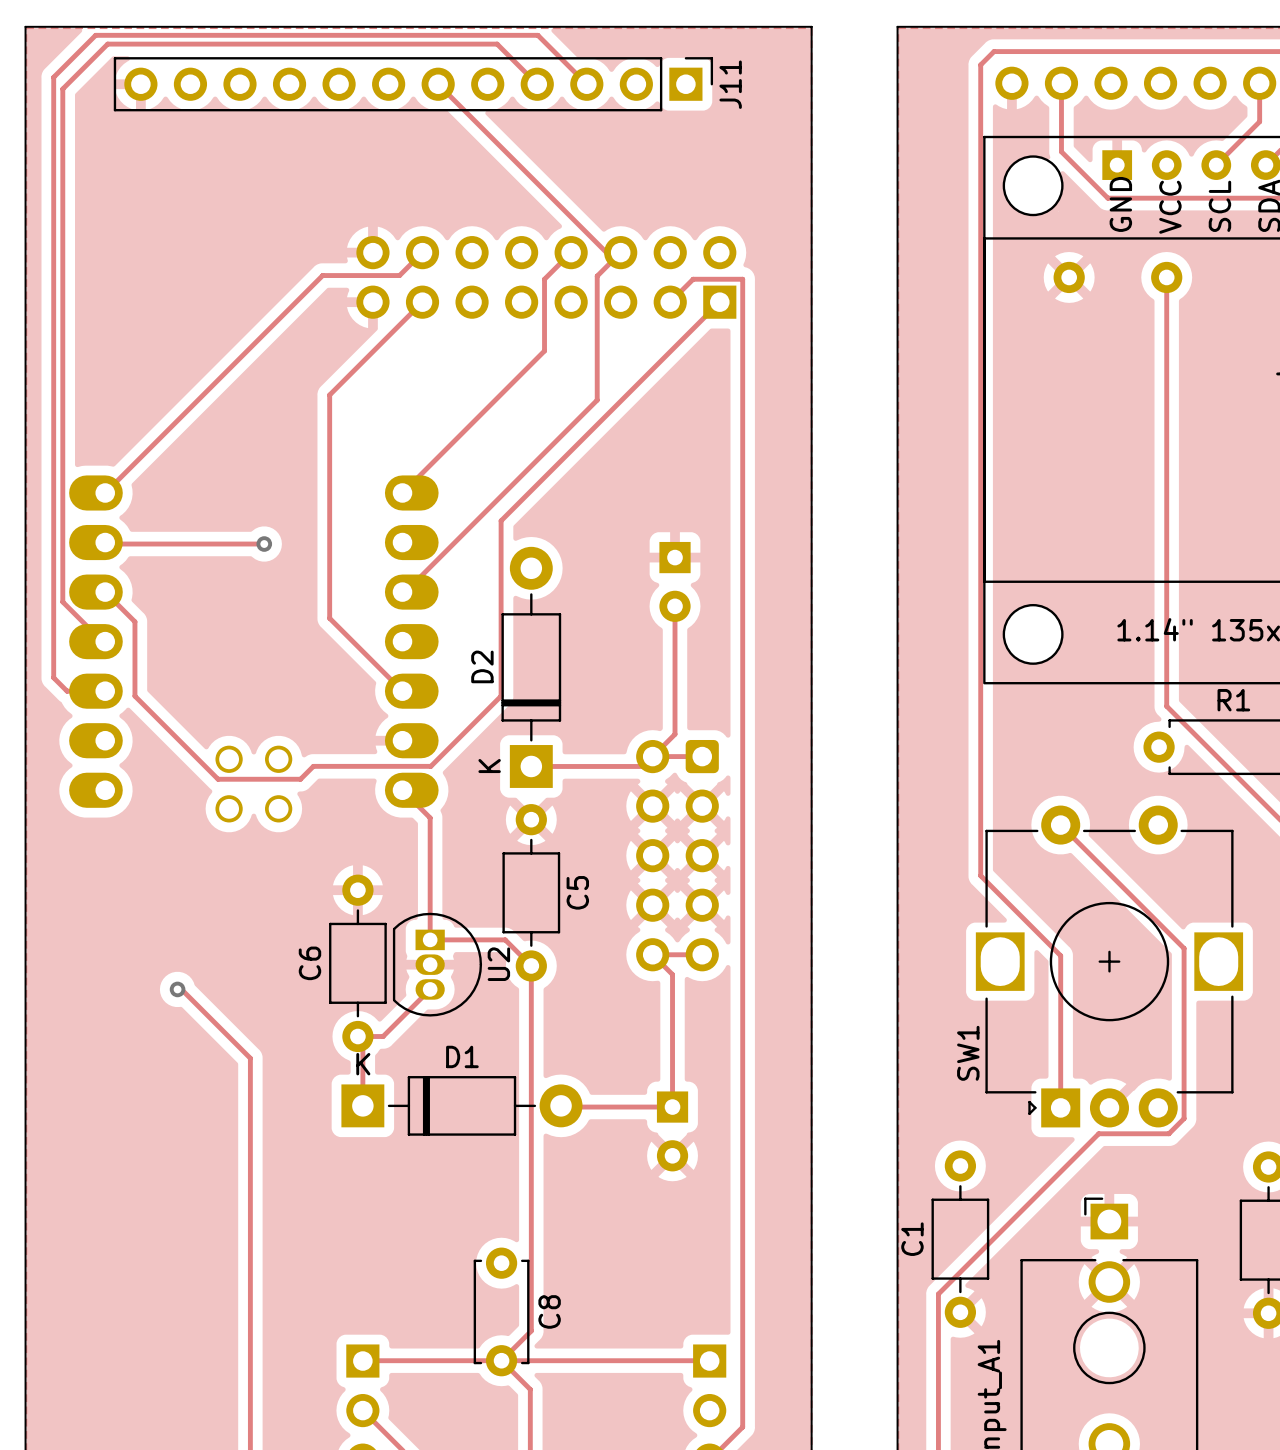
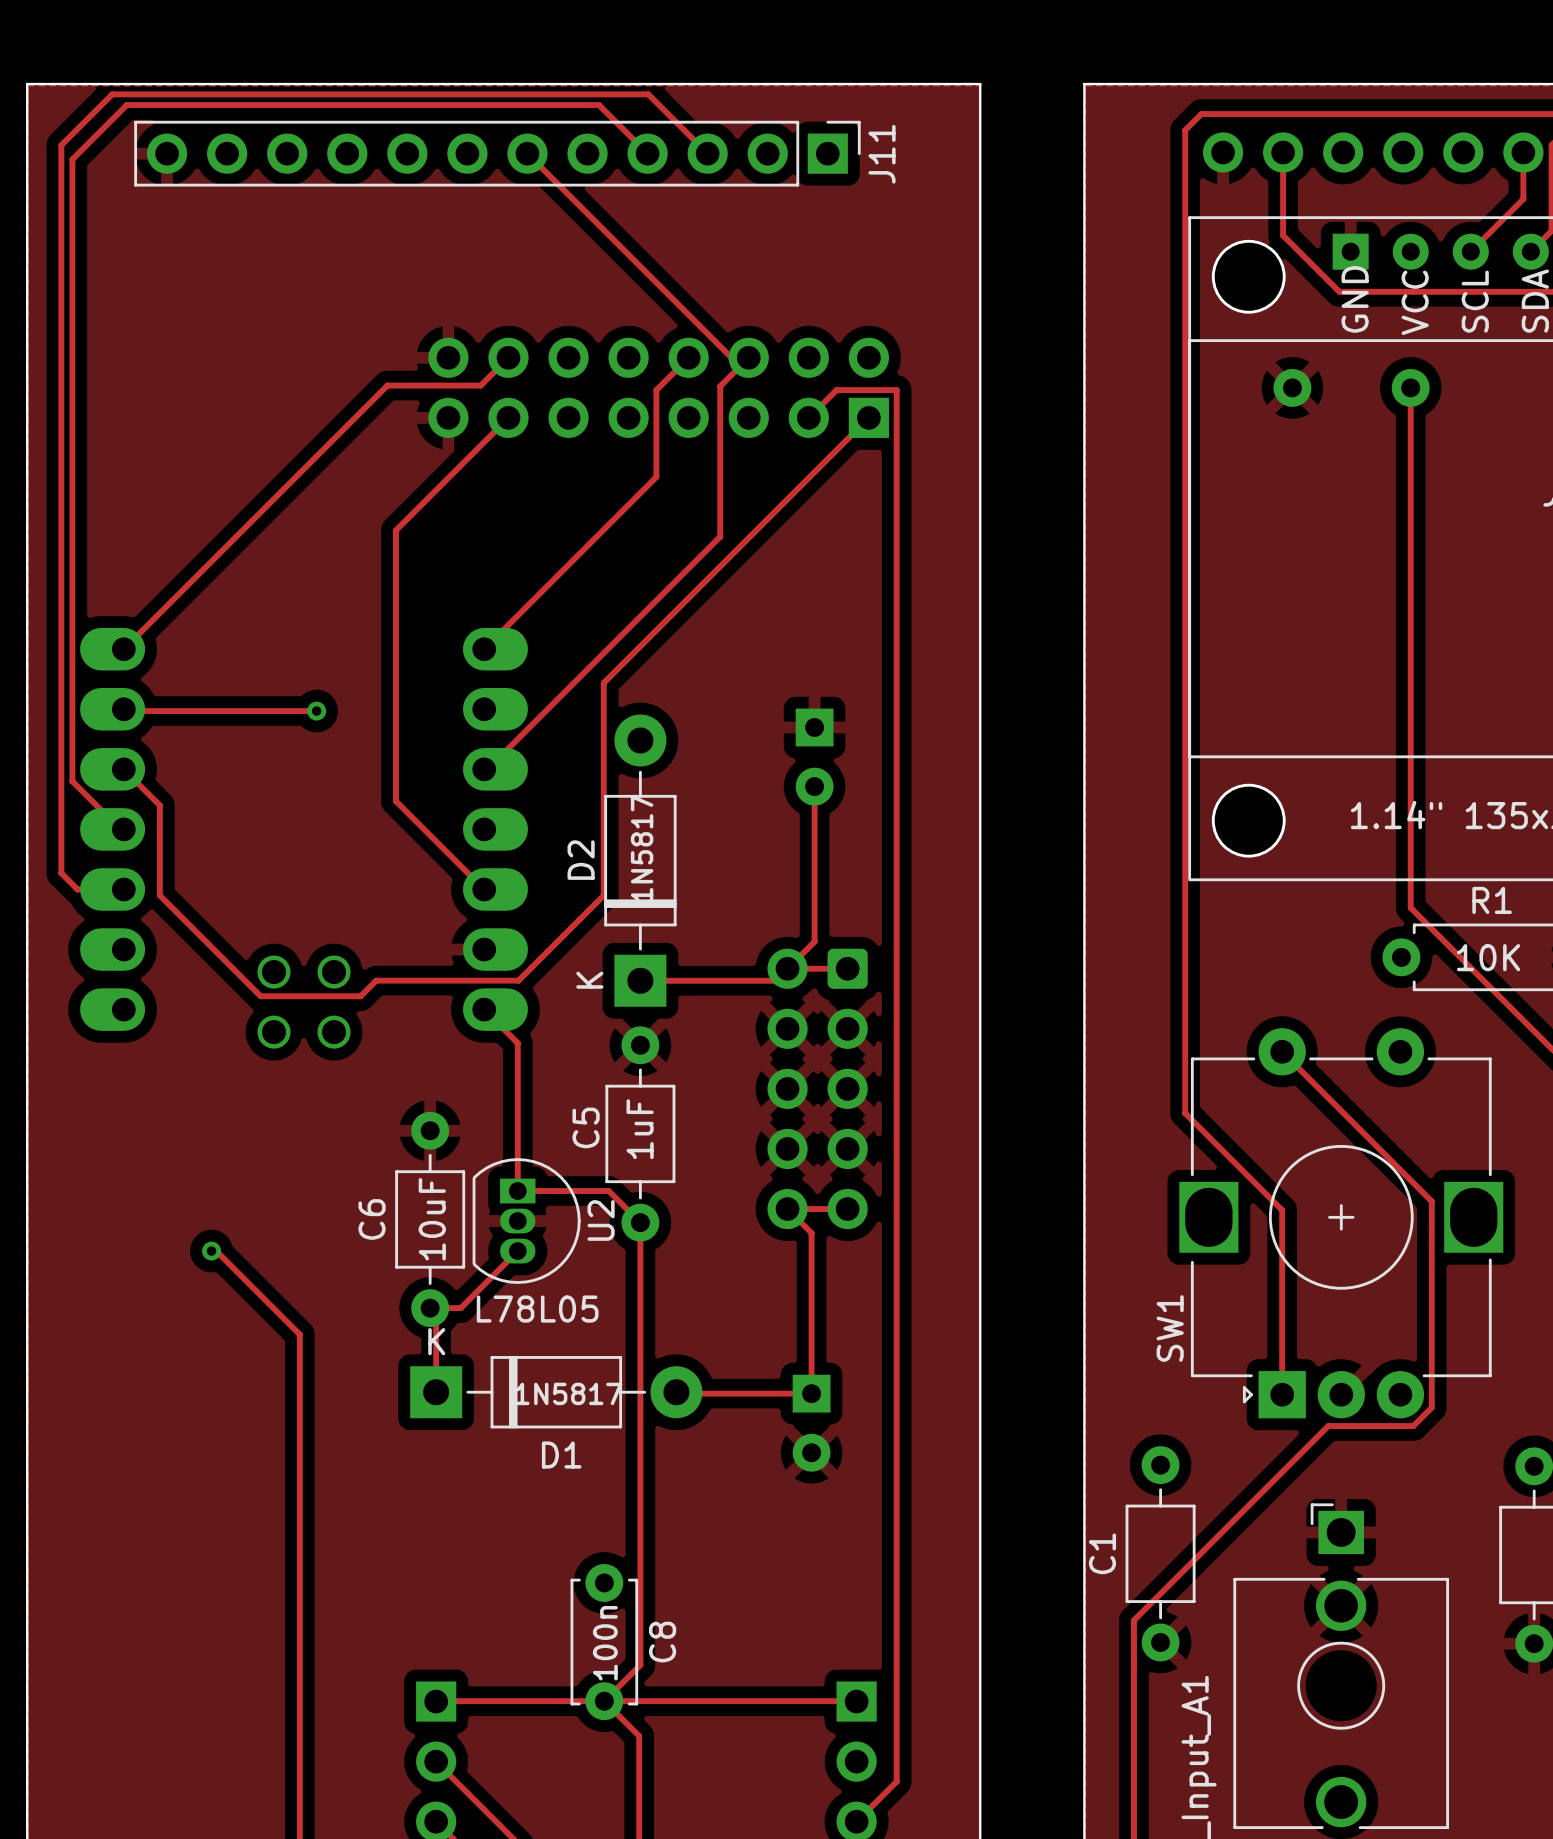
D2 value: none -> 1N5817 (642, 848)
R1 value: none -> 10K (1488, 957)
C5 value: none -> 1uF (640, 1129)
C5 name position: C5 (577, 892) -> C5 (586, 1127)
C6 value: none -> 10uF (432, 1219)
U2 value: none -> L78L05 (537, 1309)
D1 name position: D1 (462, 1056) -> D1 (561, 1455)
D1 value: none -> 1N5817 (568, 1393)
C8 value: none -> 100n (605, 1643)

